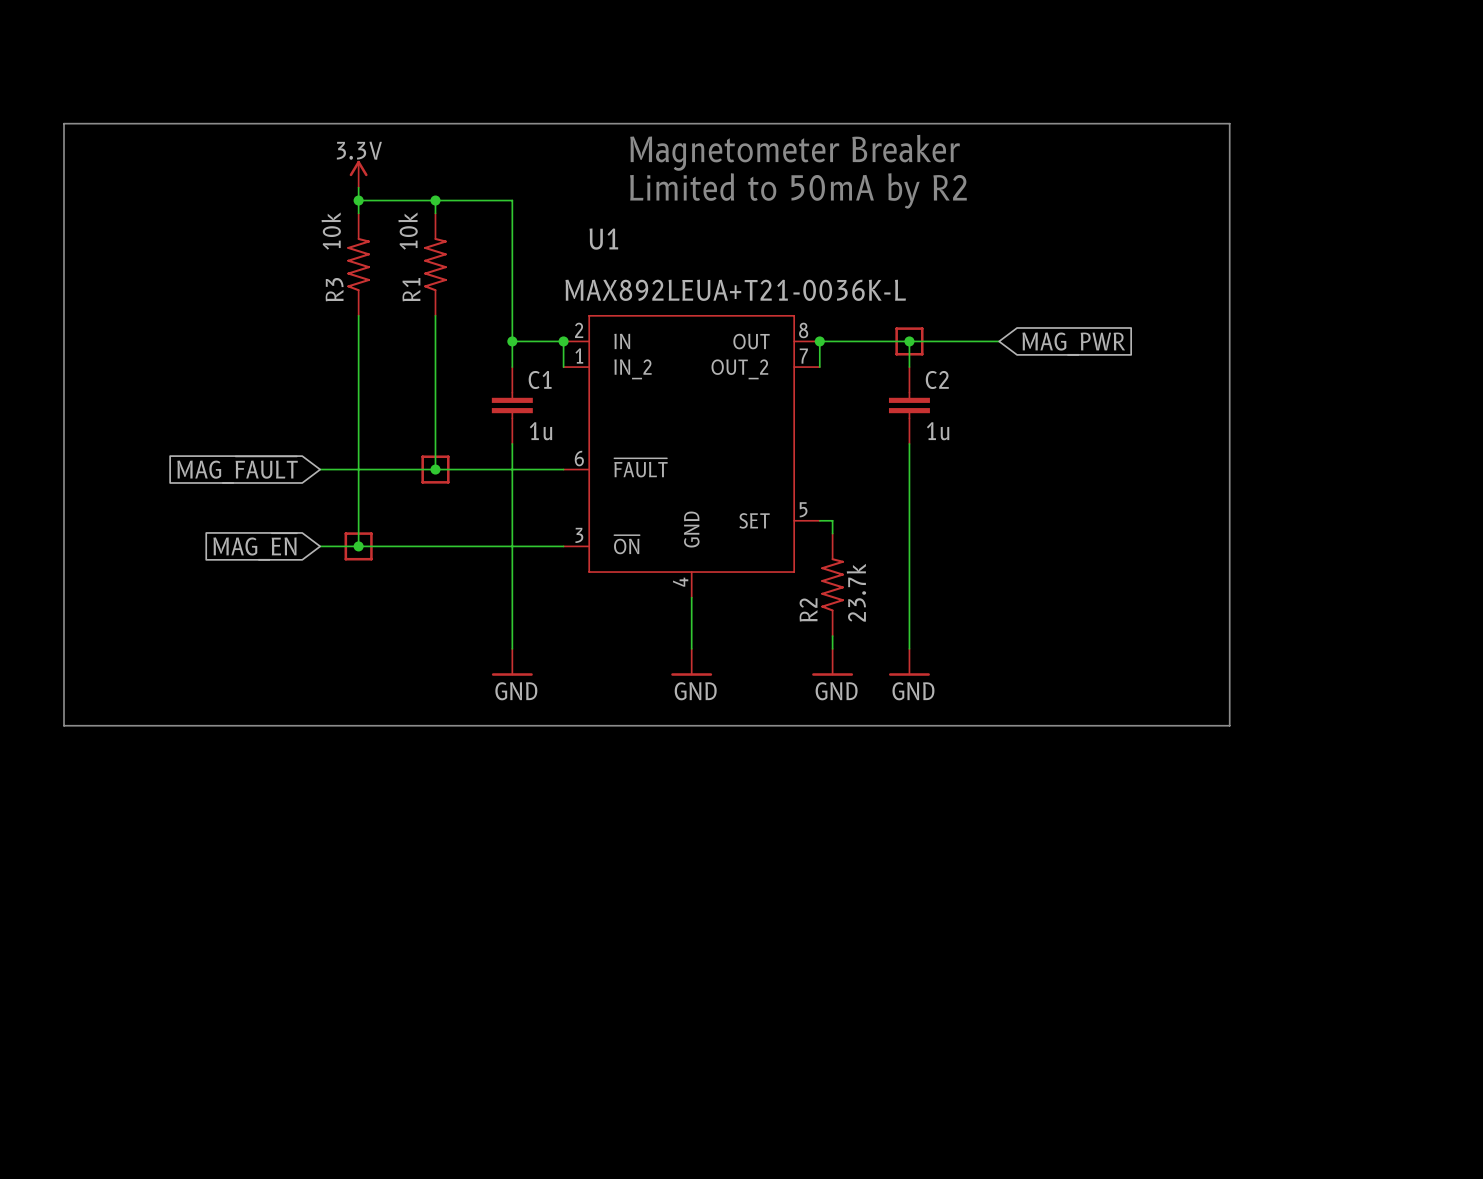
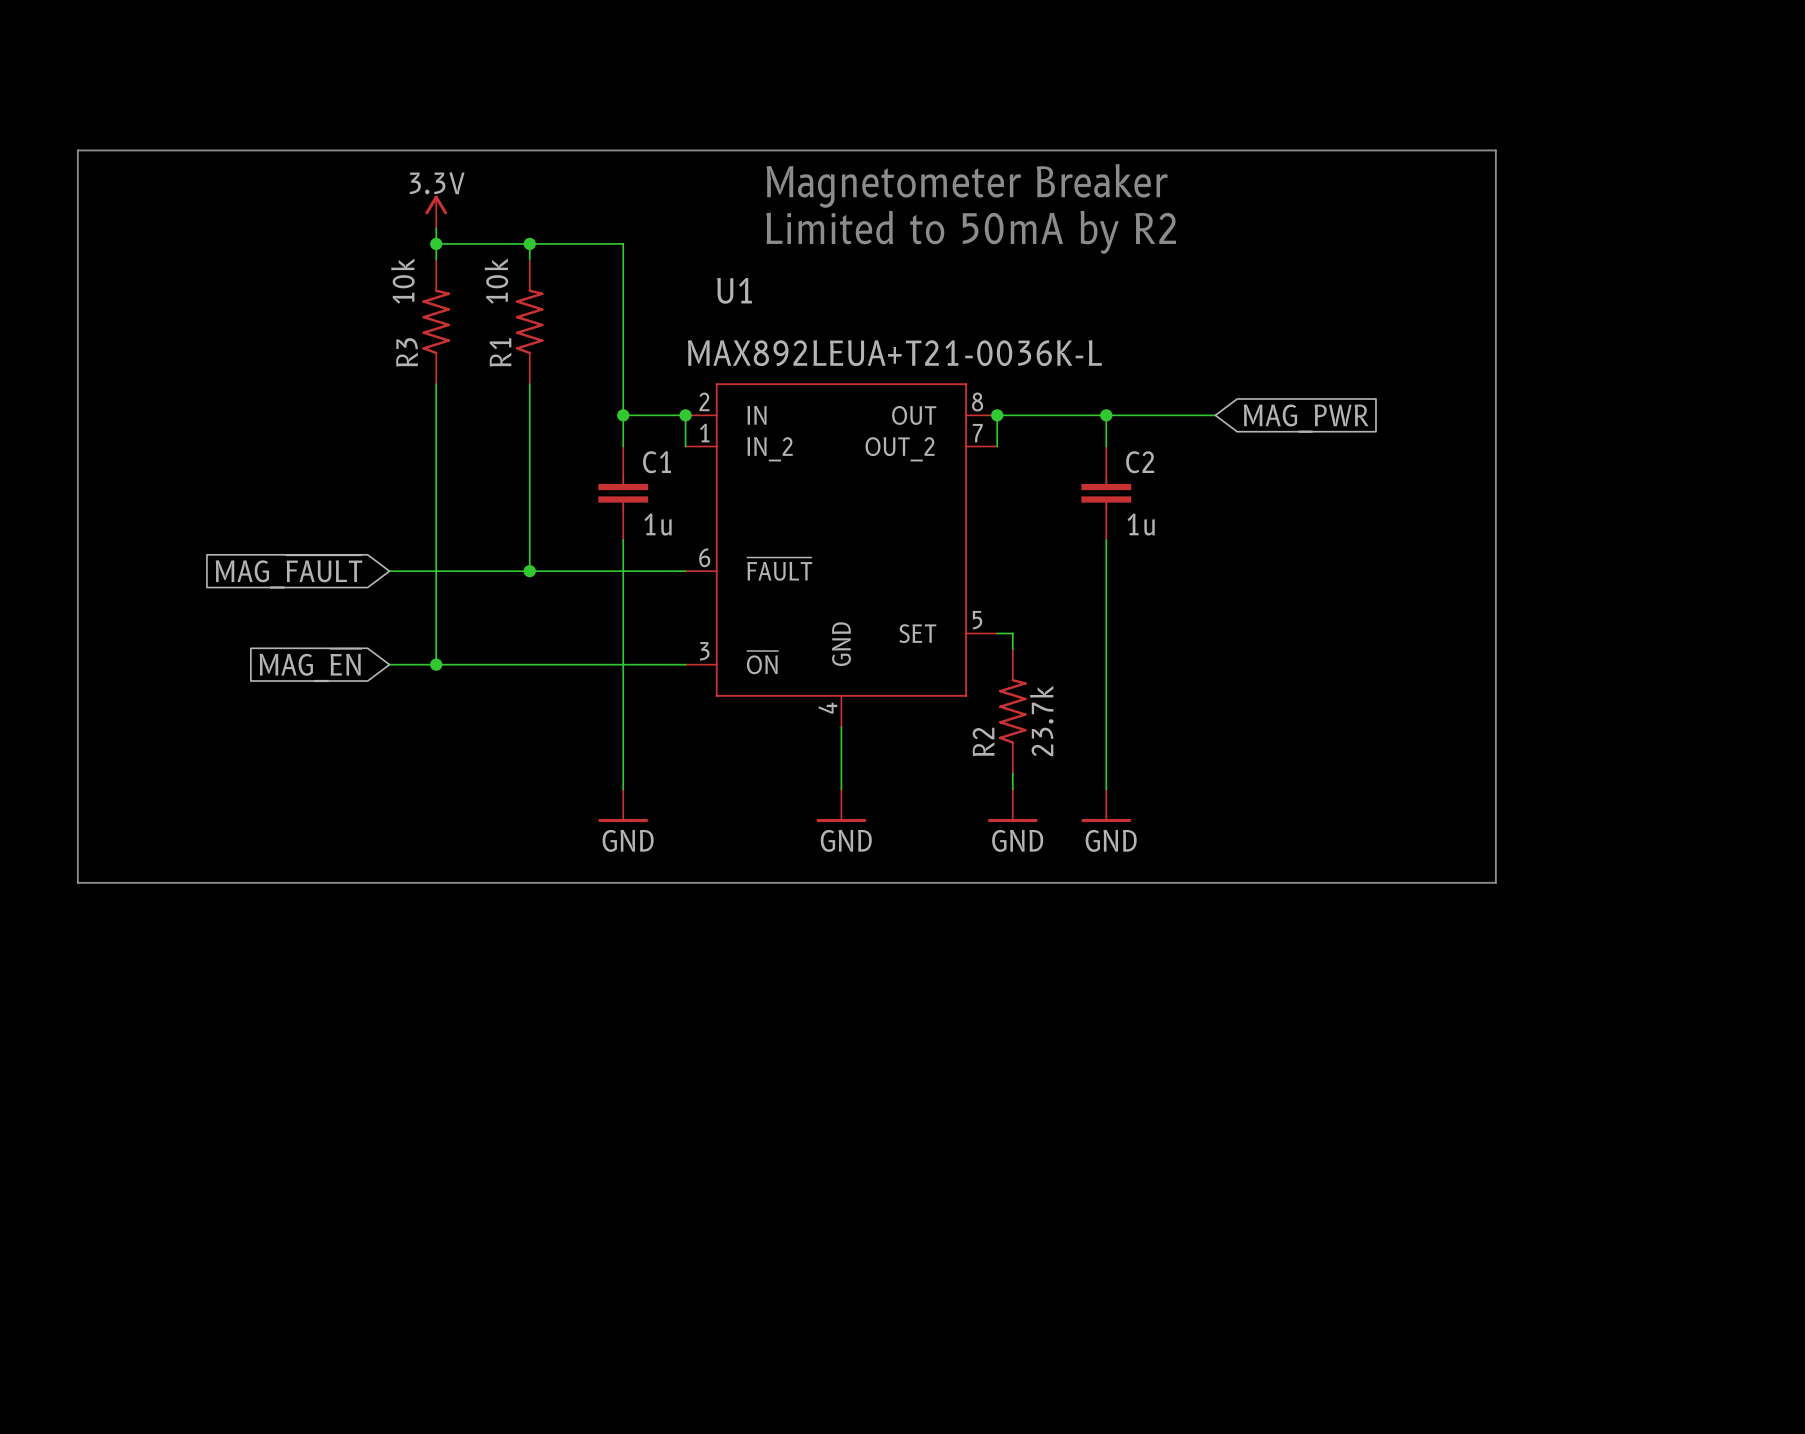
part: (909, 341) -> none
part: (435, 469) -> none
part: (358, 546) -> none

